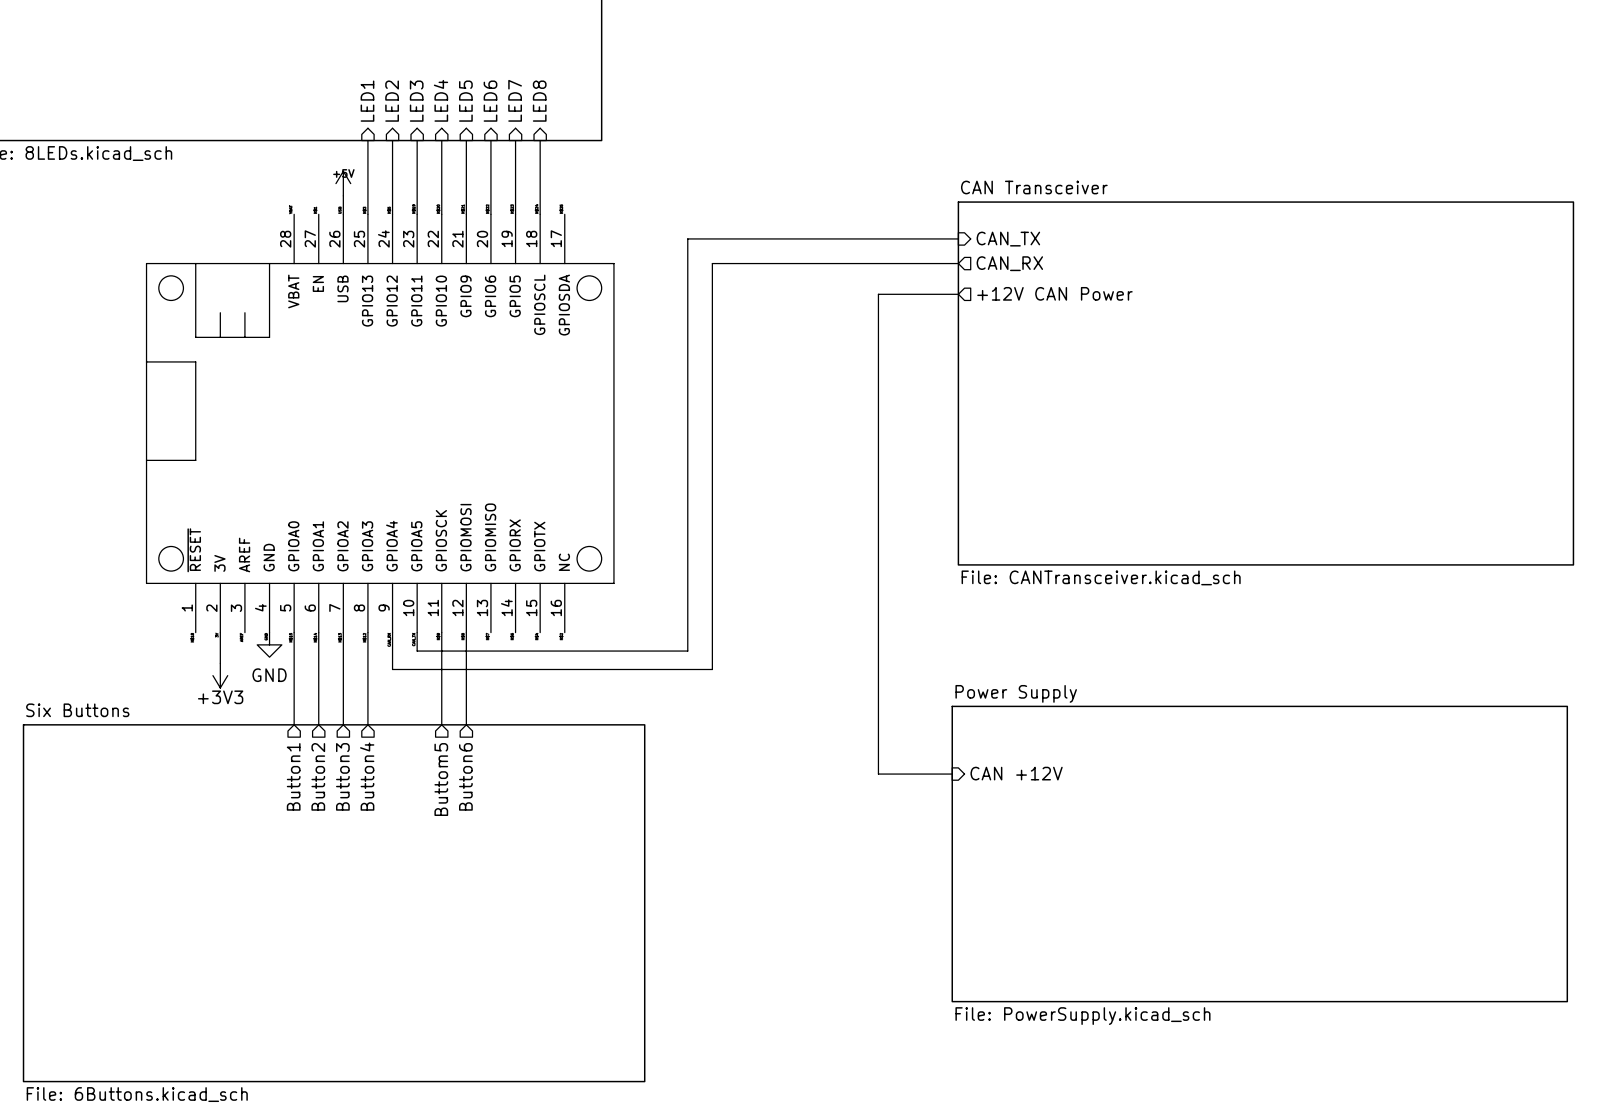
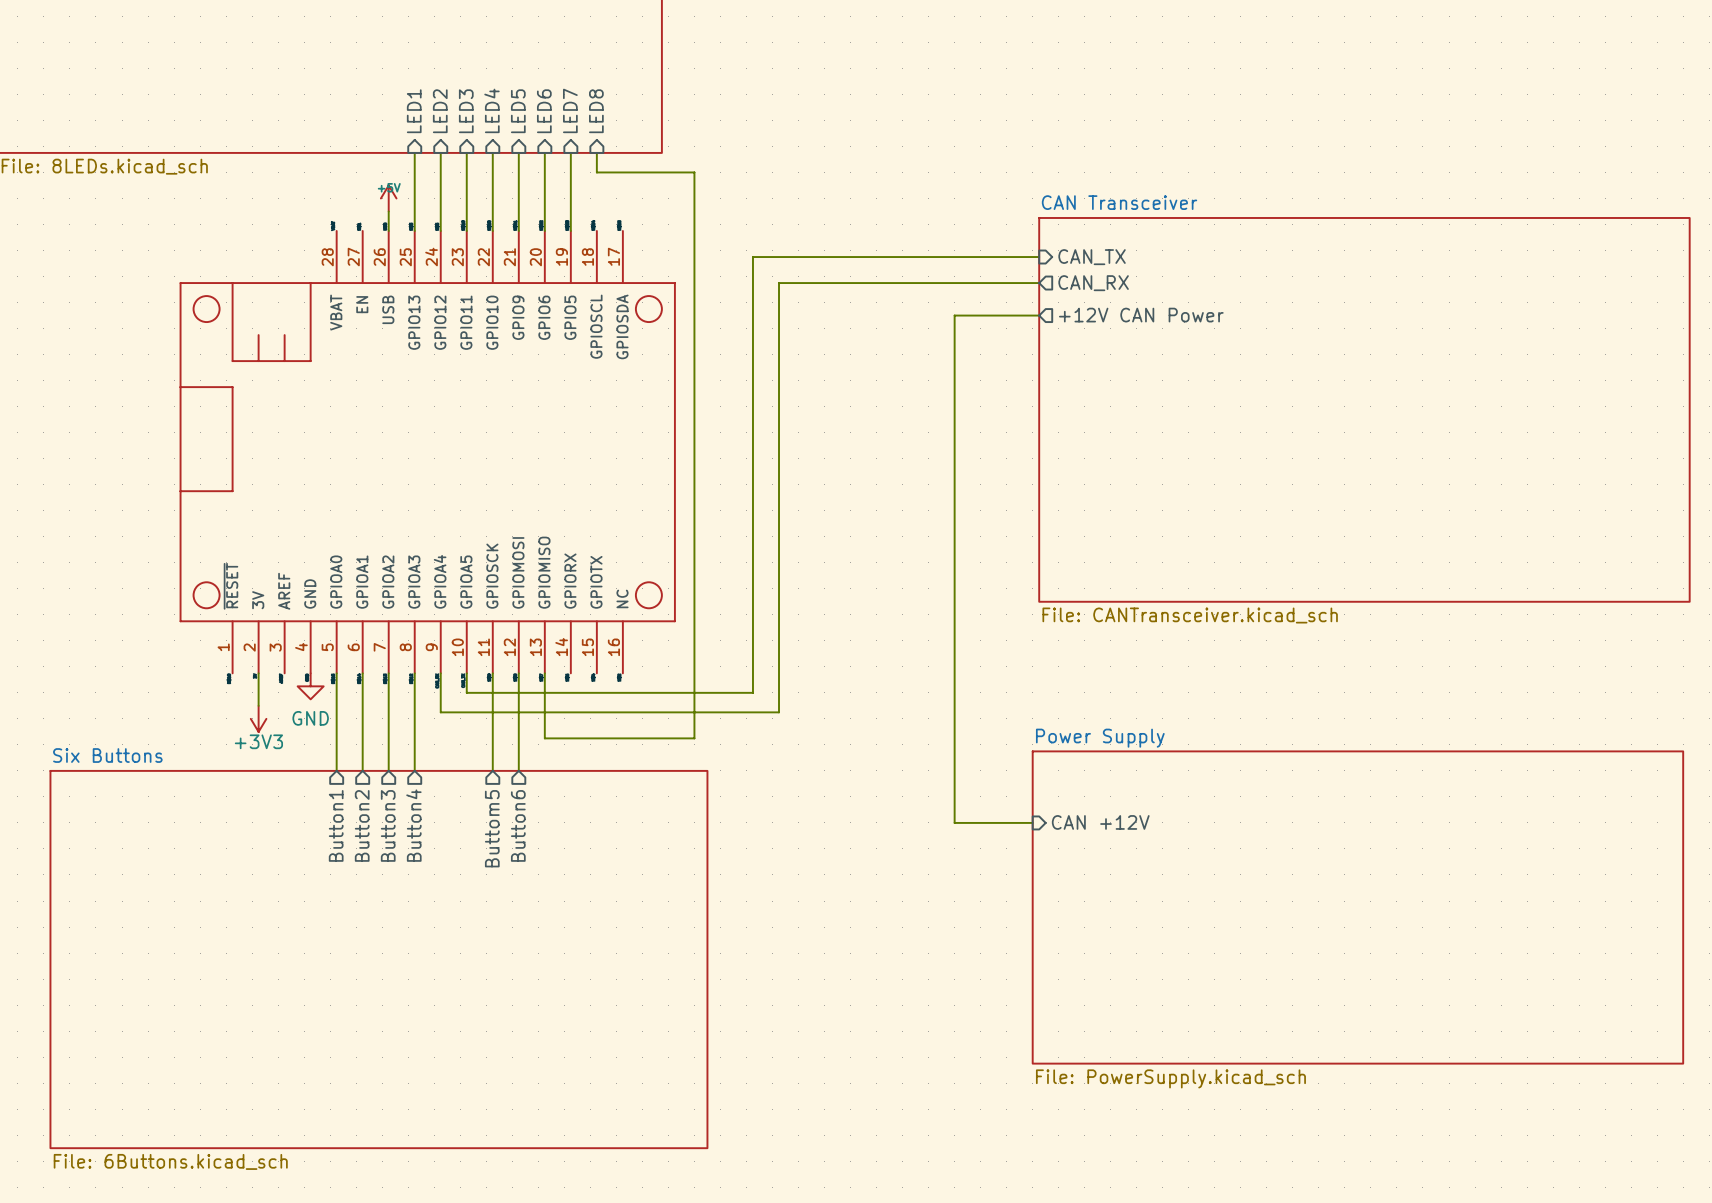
wire: (540, 158) (540, 214) -> (596, 172) (694, 172) (694, 738) (544, 738) (544, 673)

